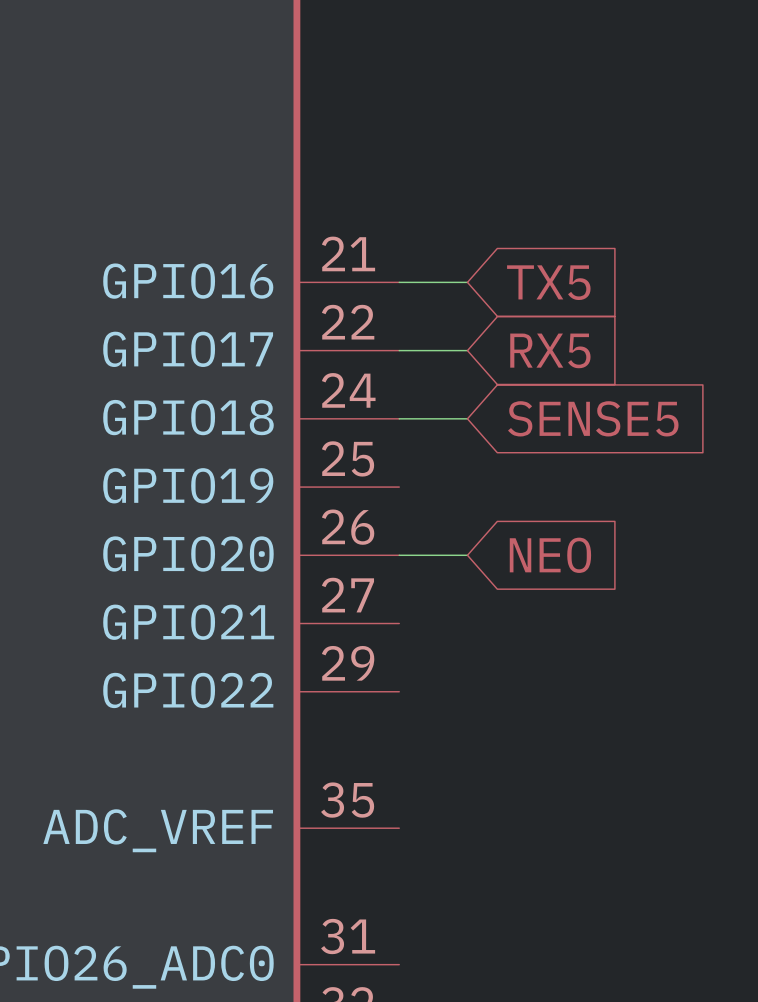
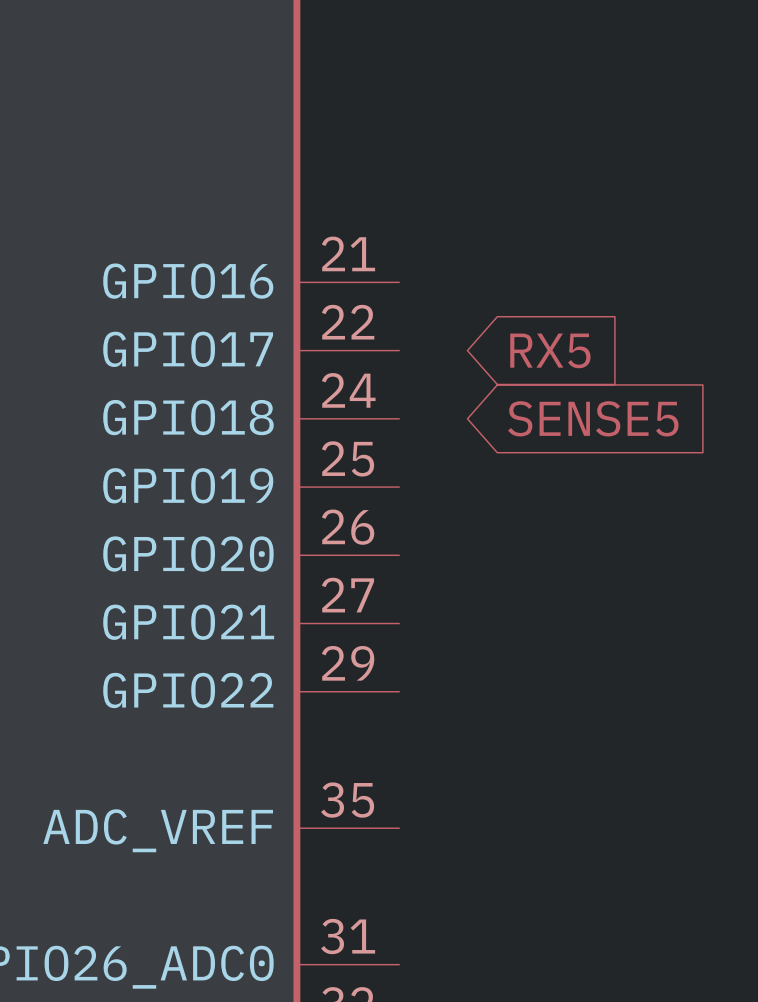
wire: (399, 282) (467, 282) -> none
global label: TX5 (548, 282) -> none
wire: (399, 350) (467, 350) -> none
wire: (399, 418) (467, 418) -> none
wire: (399, 555) (467, 555) -> none
global label: NEO (550, 555) -> none

